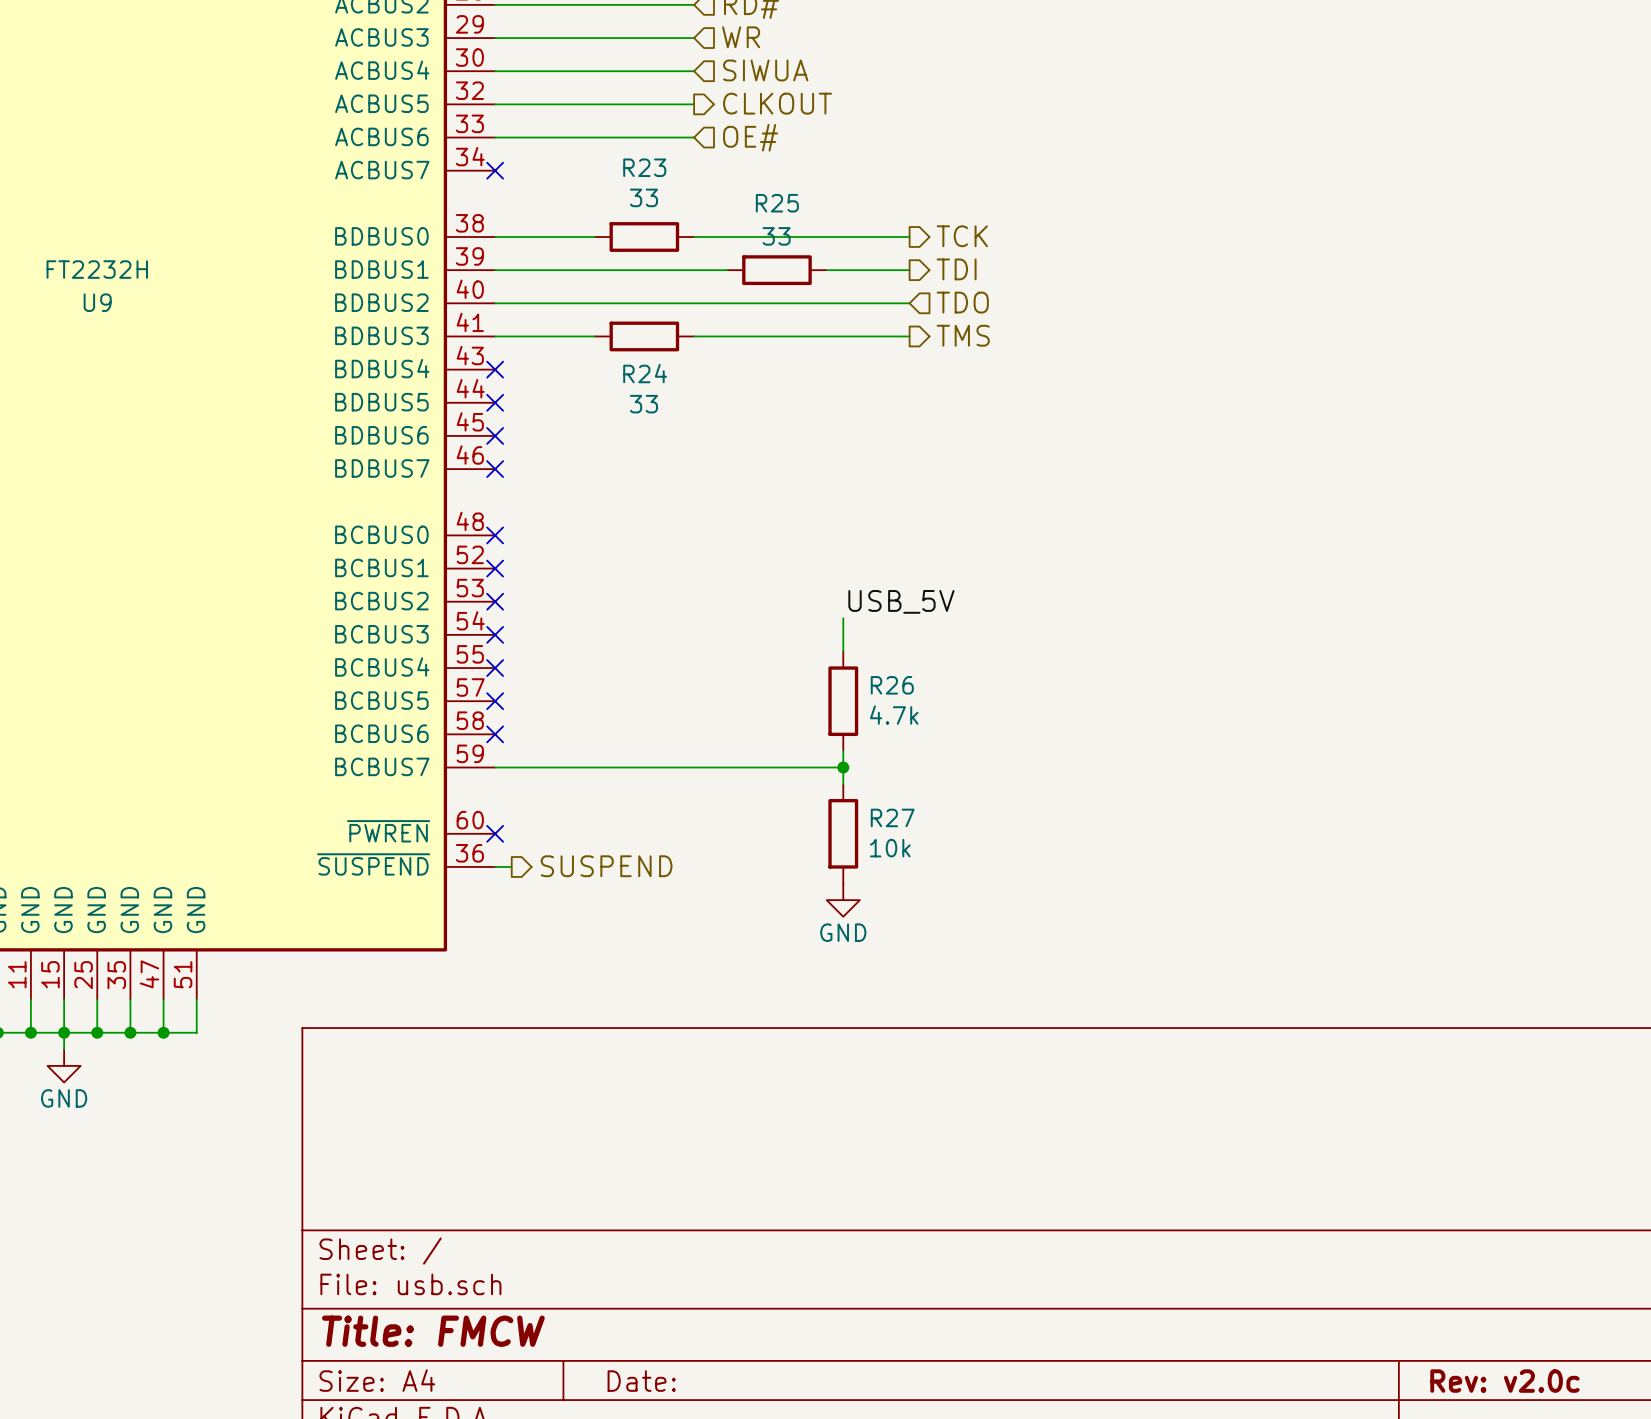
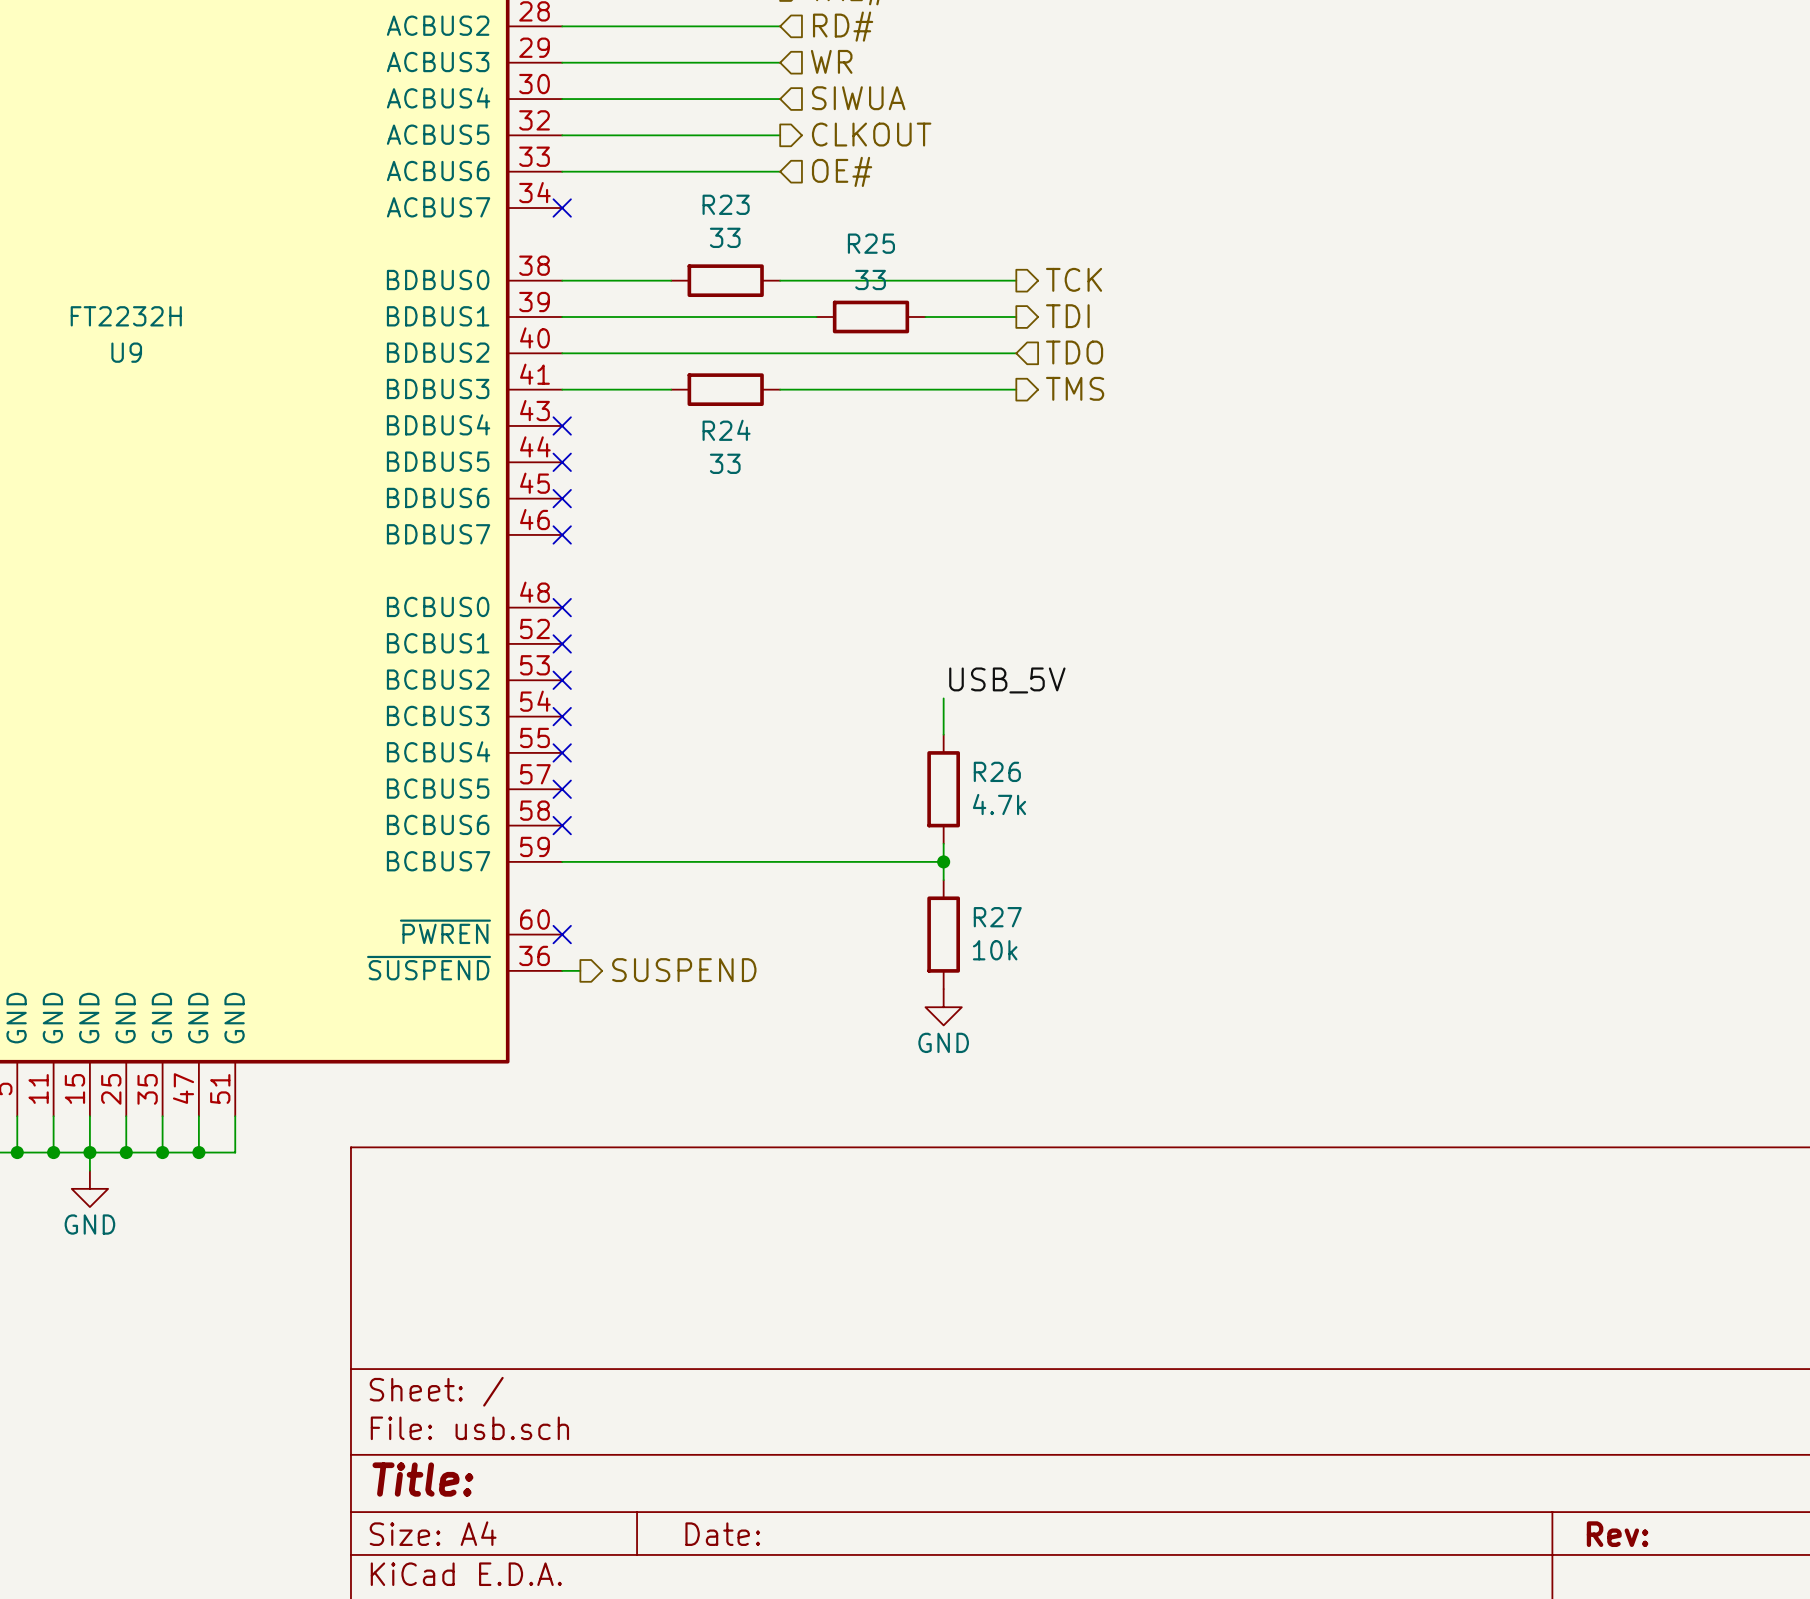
title block: Title: FMCW (433, 1331) -> Title: (422, 1479)
title block: Rev: v2.0c (1504, 1381) -> Rev: (1617, 1534)

